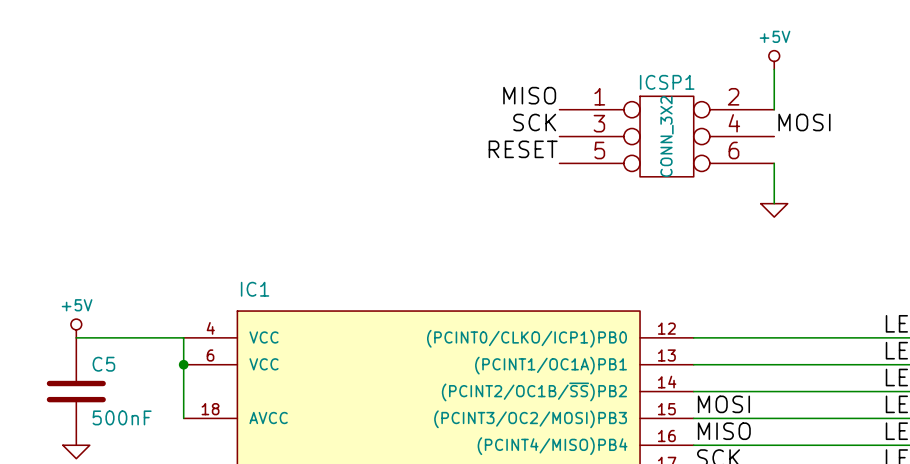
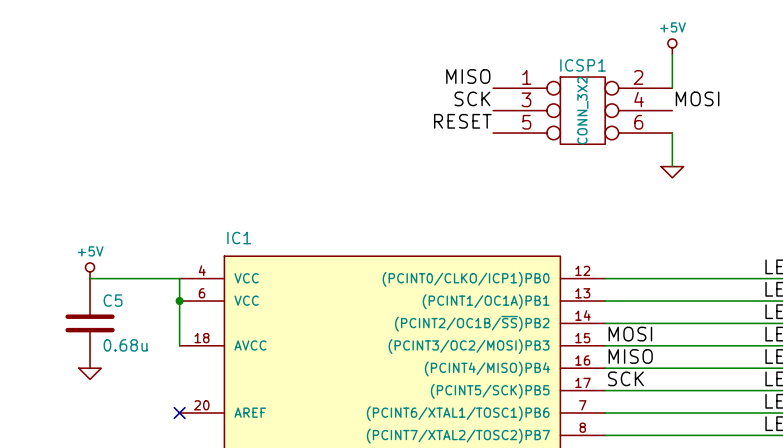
C5 value: 500nF (122, 417) -> 0.68u (125, 345)

